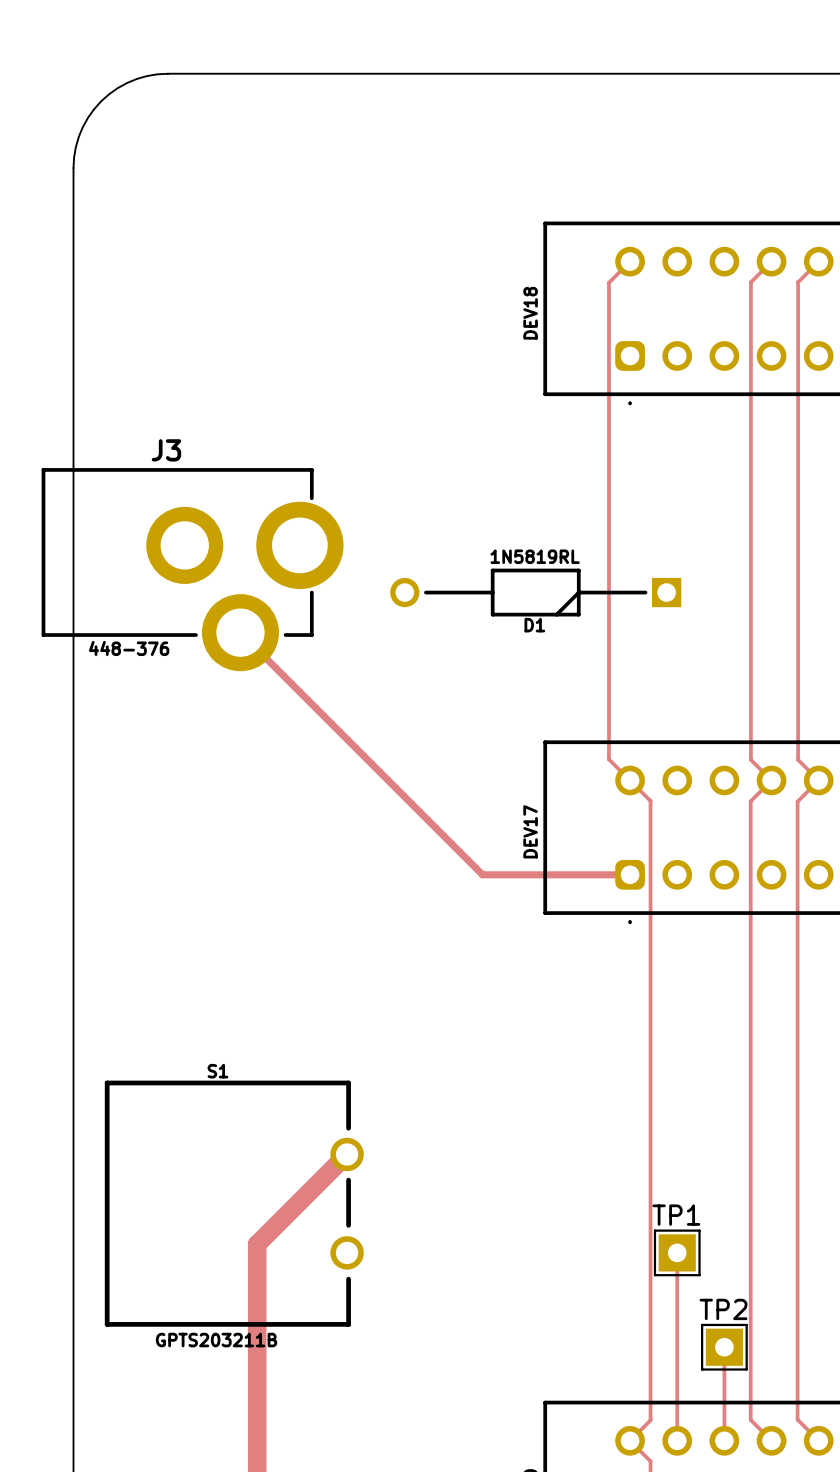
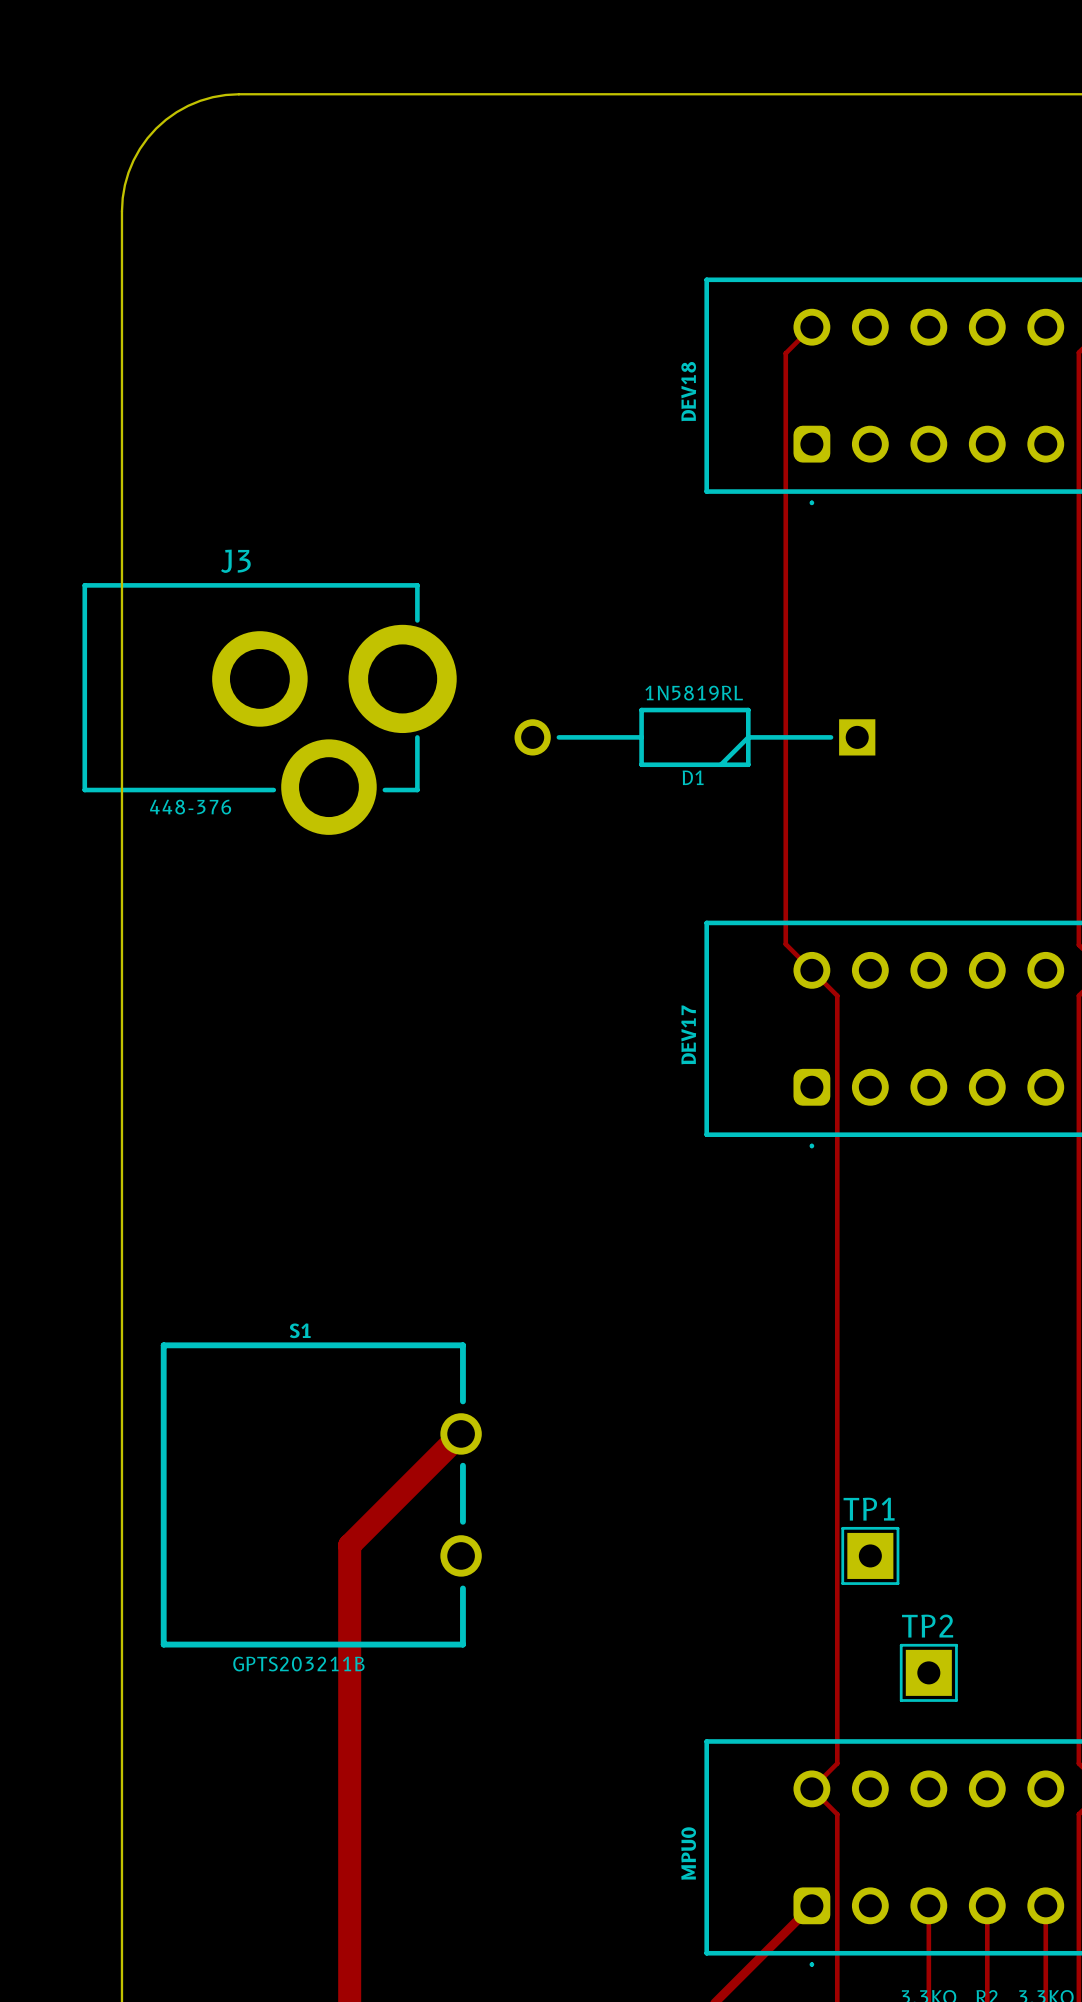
track: (771, 261) (750, 282) (750, 759) (771, 780) (750, 801) (750, 1419) (771, 1440) -> none
track: (818, 261) (798, 282) (798, 759) (818, 780) (797, 801) (797, 1419) (818, 1440) -> none
track: (240, 632) (482, 874) (630, 874) -> none
track: (677, 1252) (677, 1440) -> none
track: (724, 1347) (724, 1440) -> none

